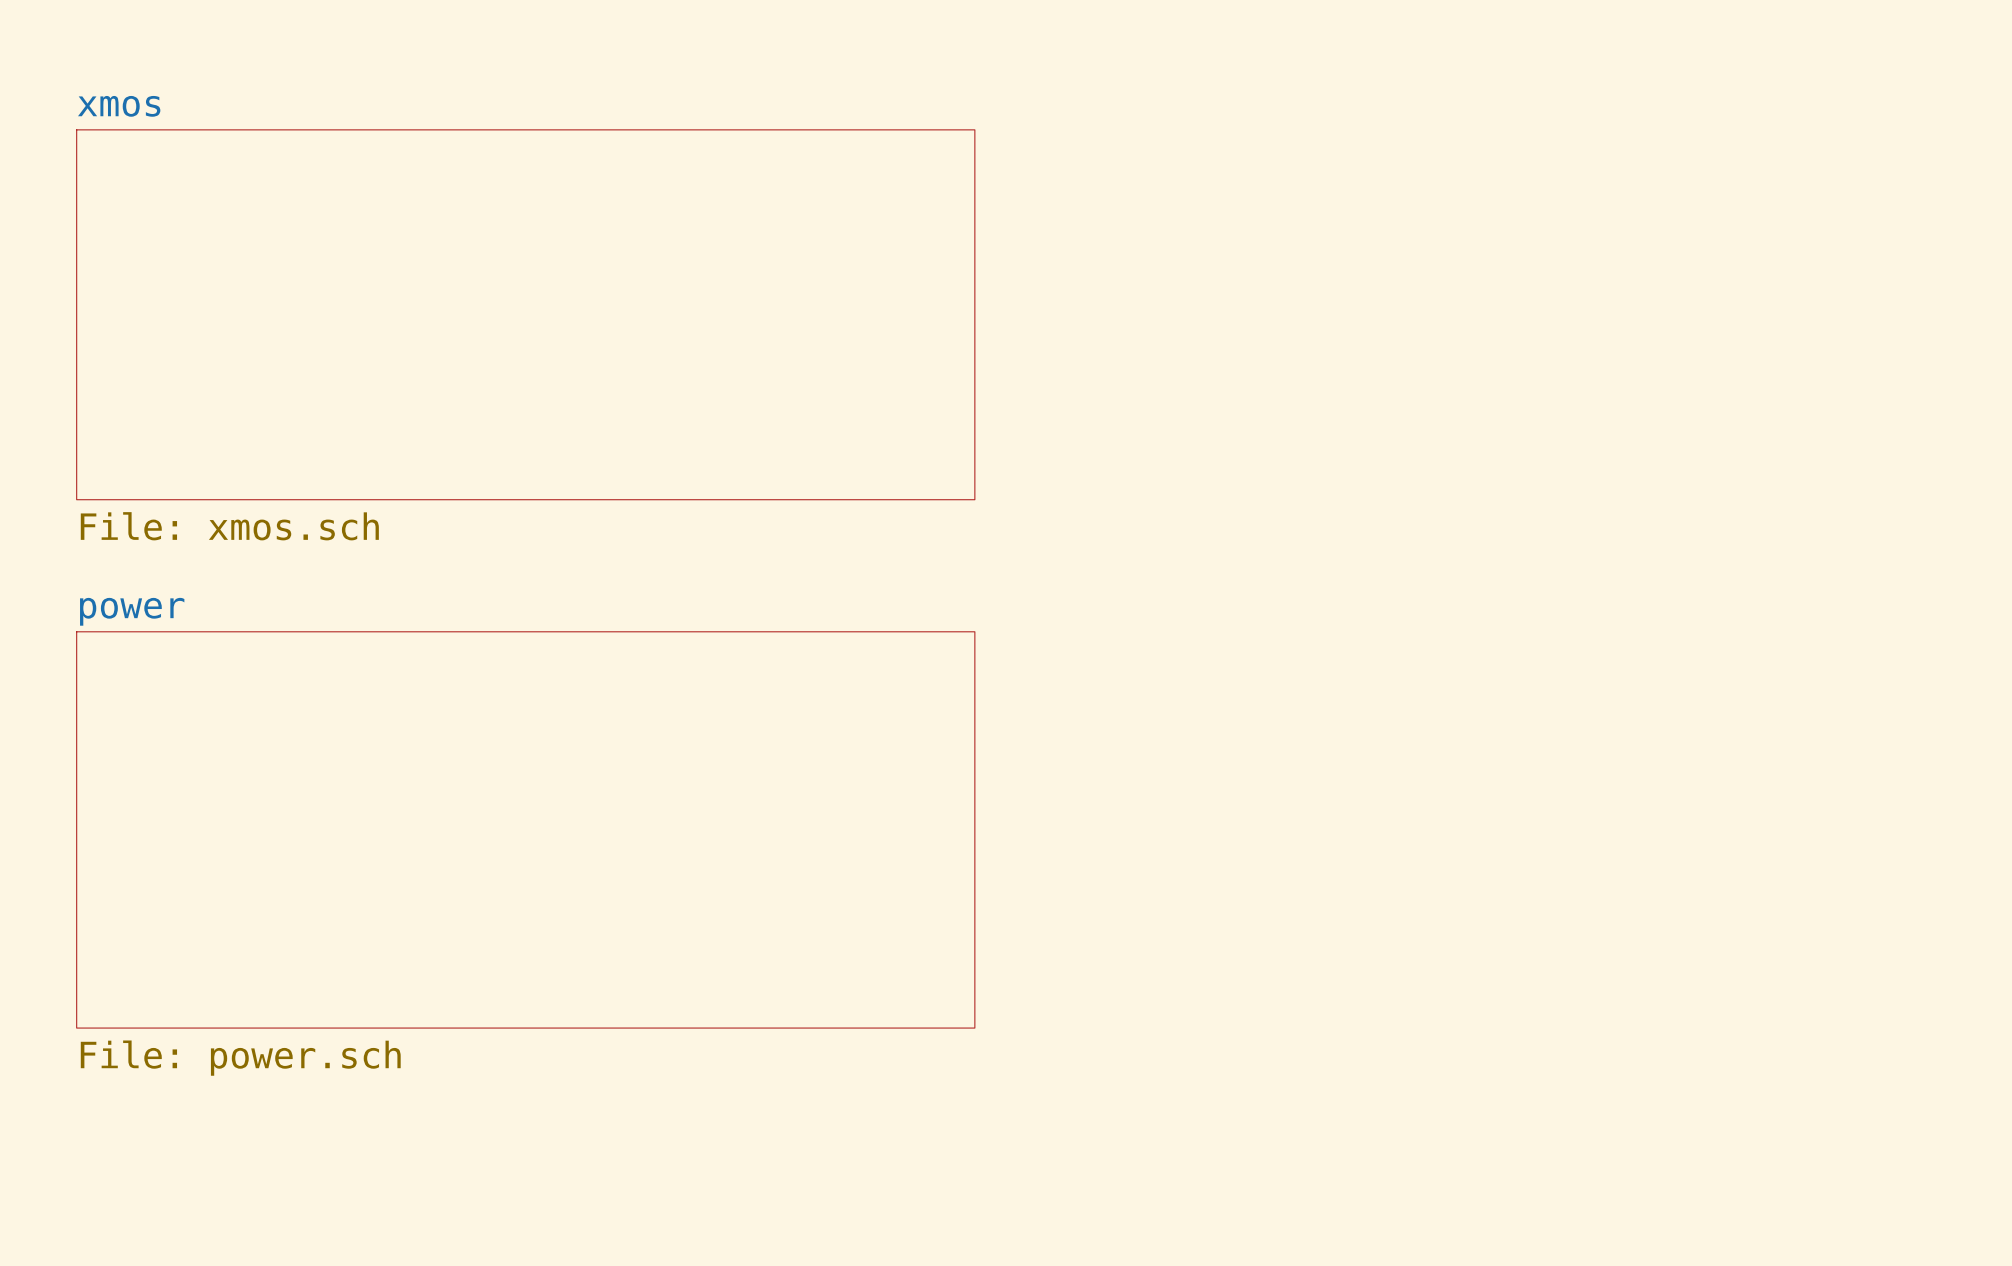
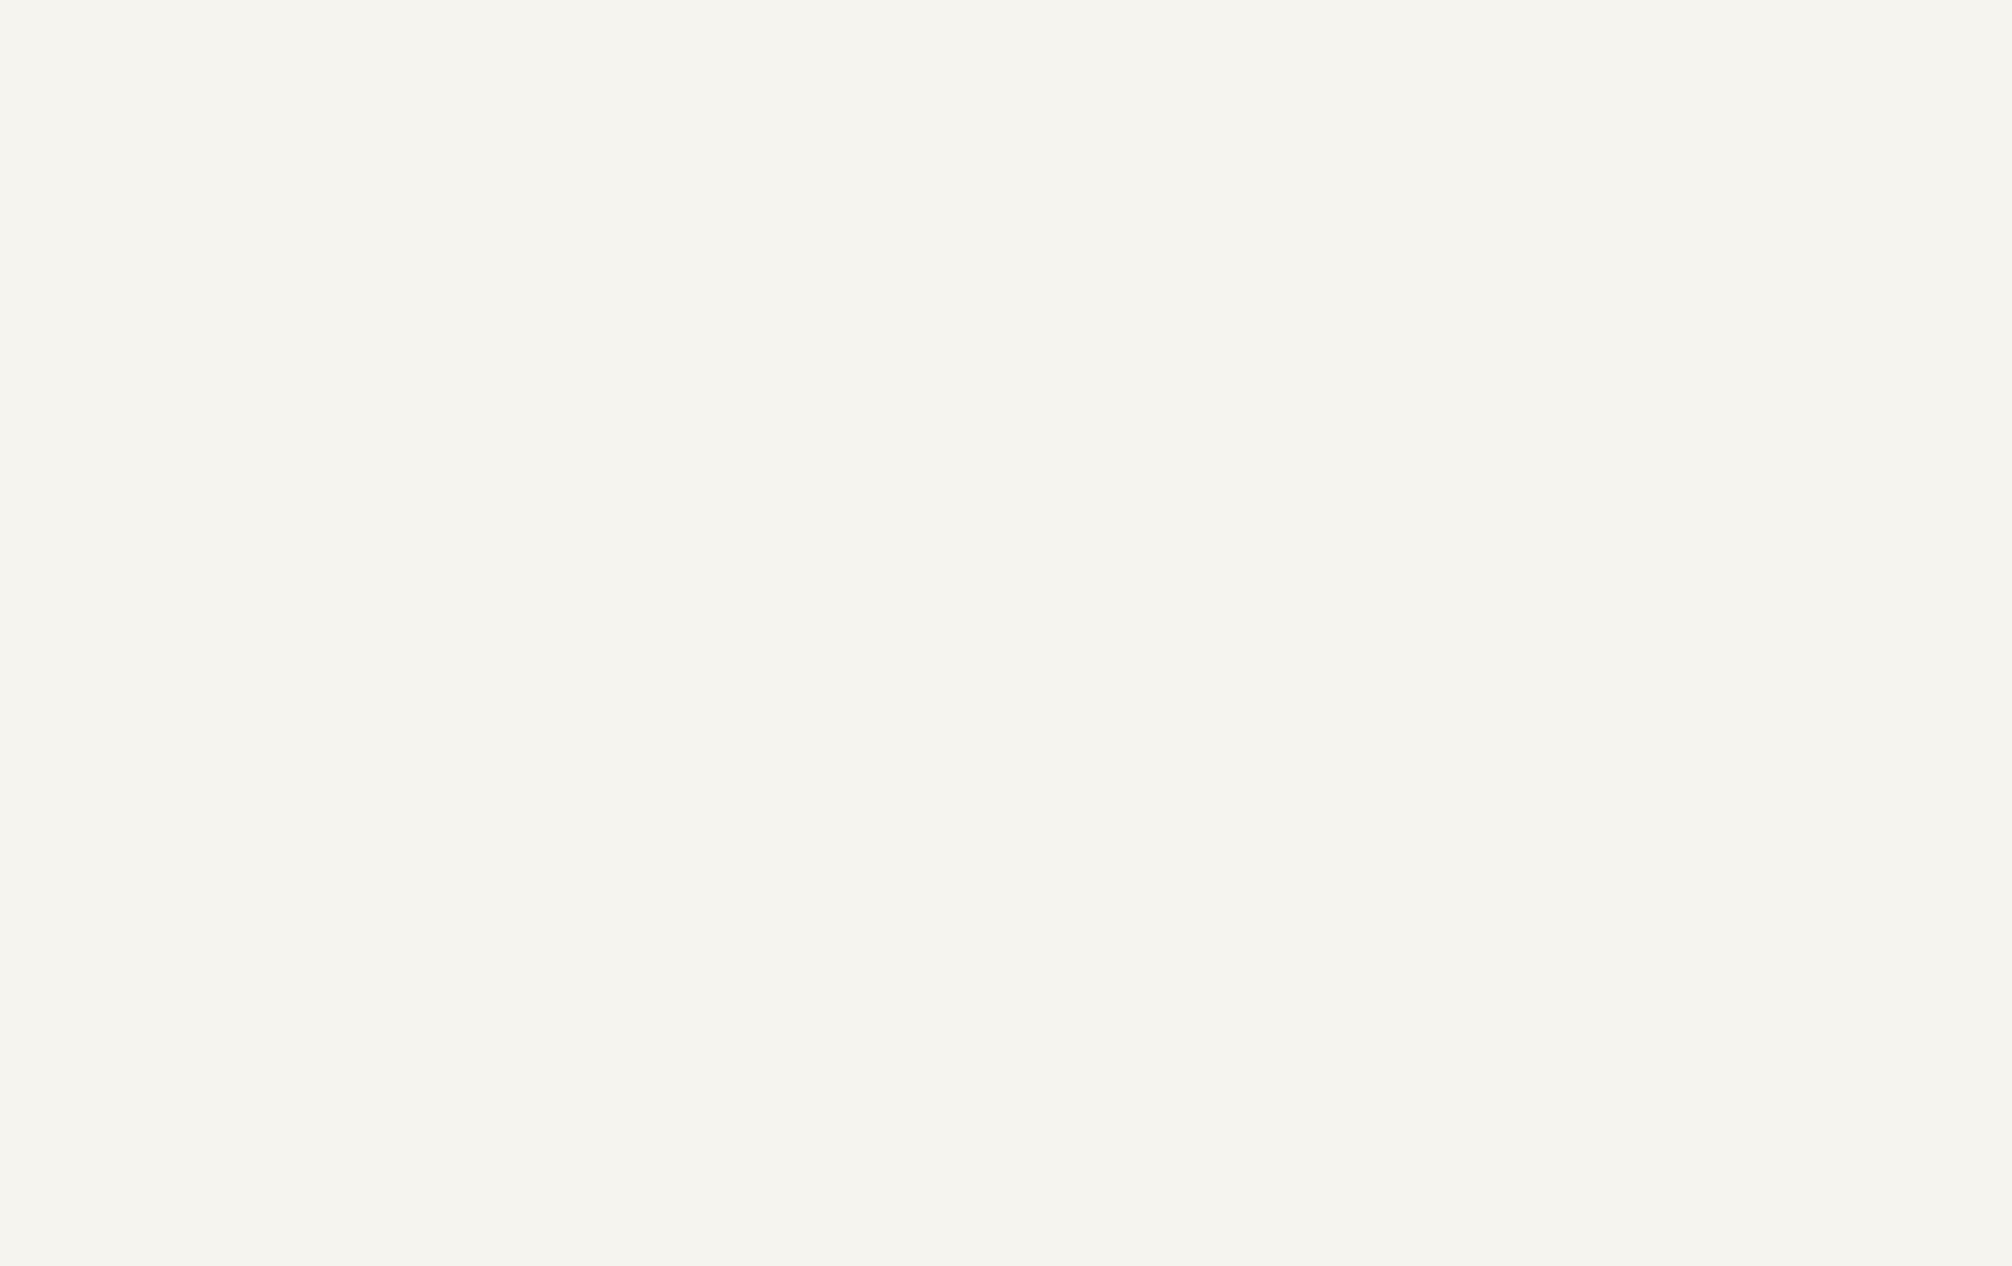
sheet xmos: File: xmos.sch (525, 314) -> none
sheet power: File: power.sch (525, 829) -> none

